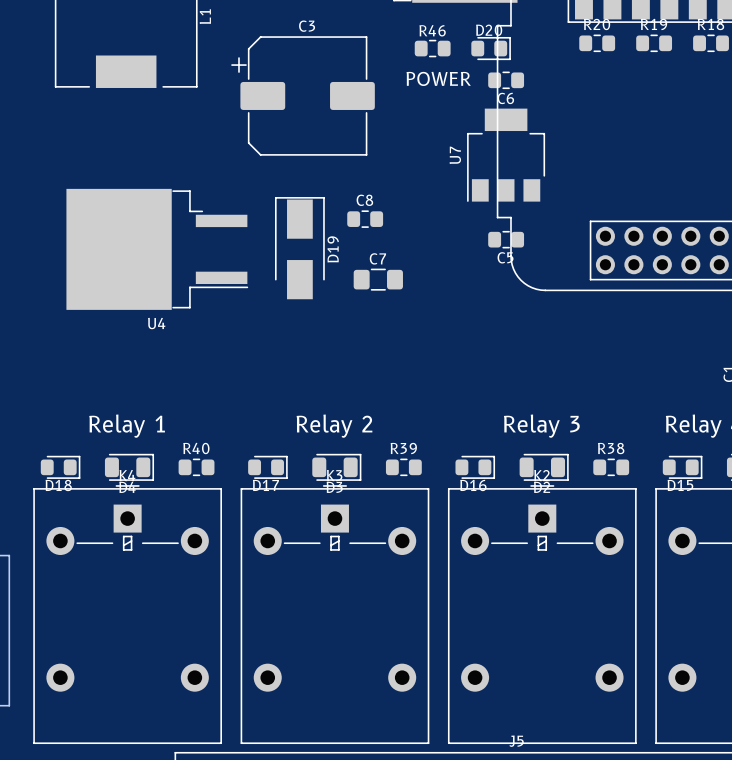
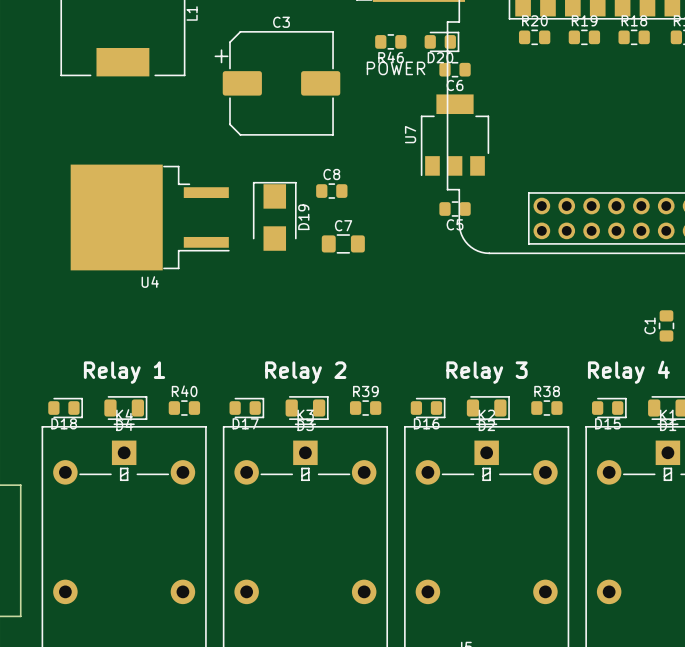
R46 name position: R46 (432, 30) -> R46 (391, 57)
D20 name position: D20 (489, 30) -> D20 (440, 57)
D19 footprint: [275, 197, 325, 300] -> [253, 182, 297, 251]

